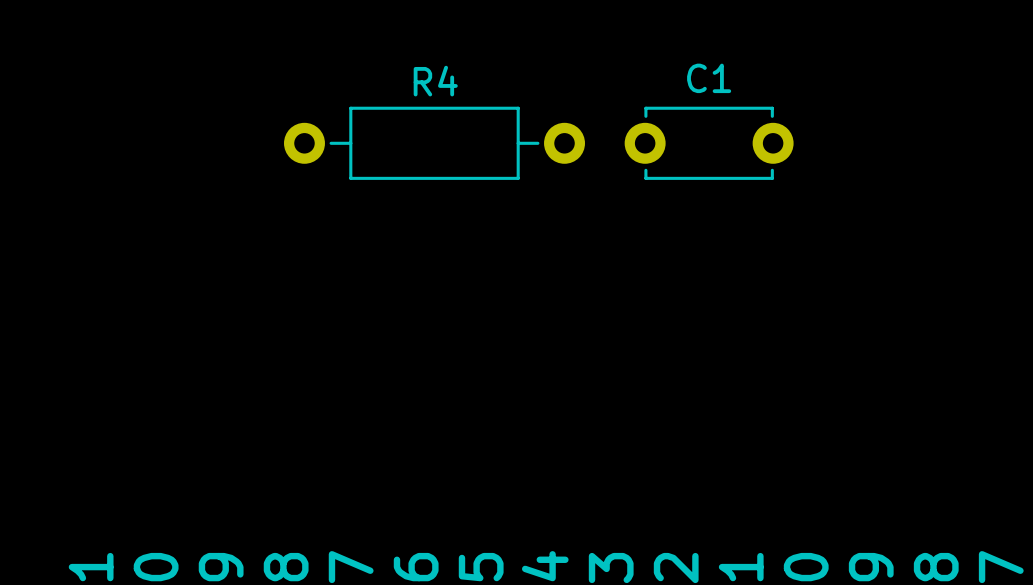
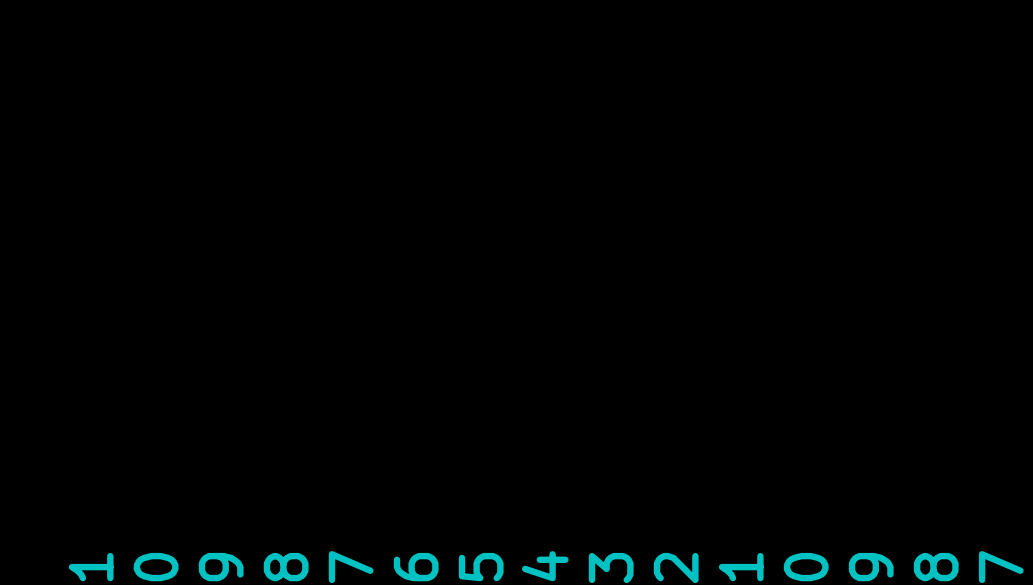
R4: (434, 143) -> none
C1: (709, 143) -> none

